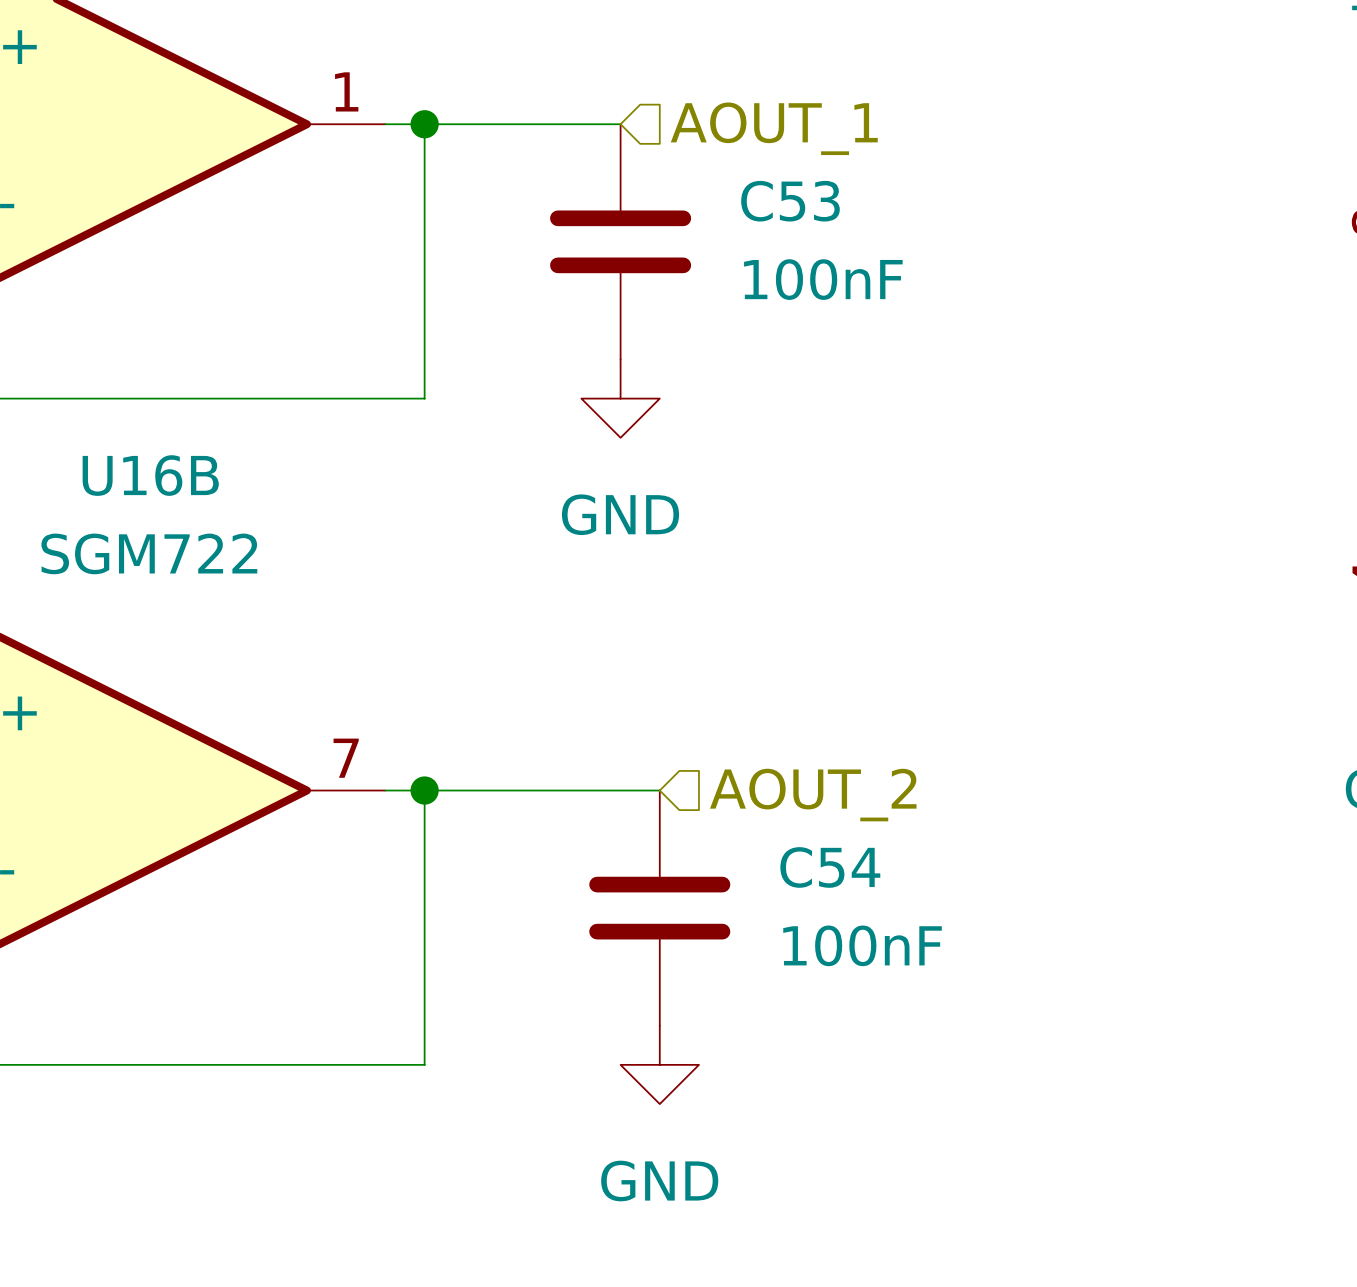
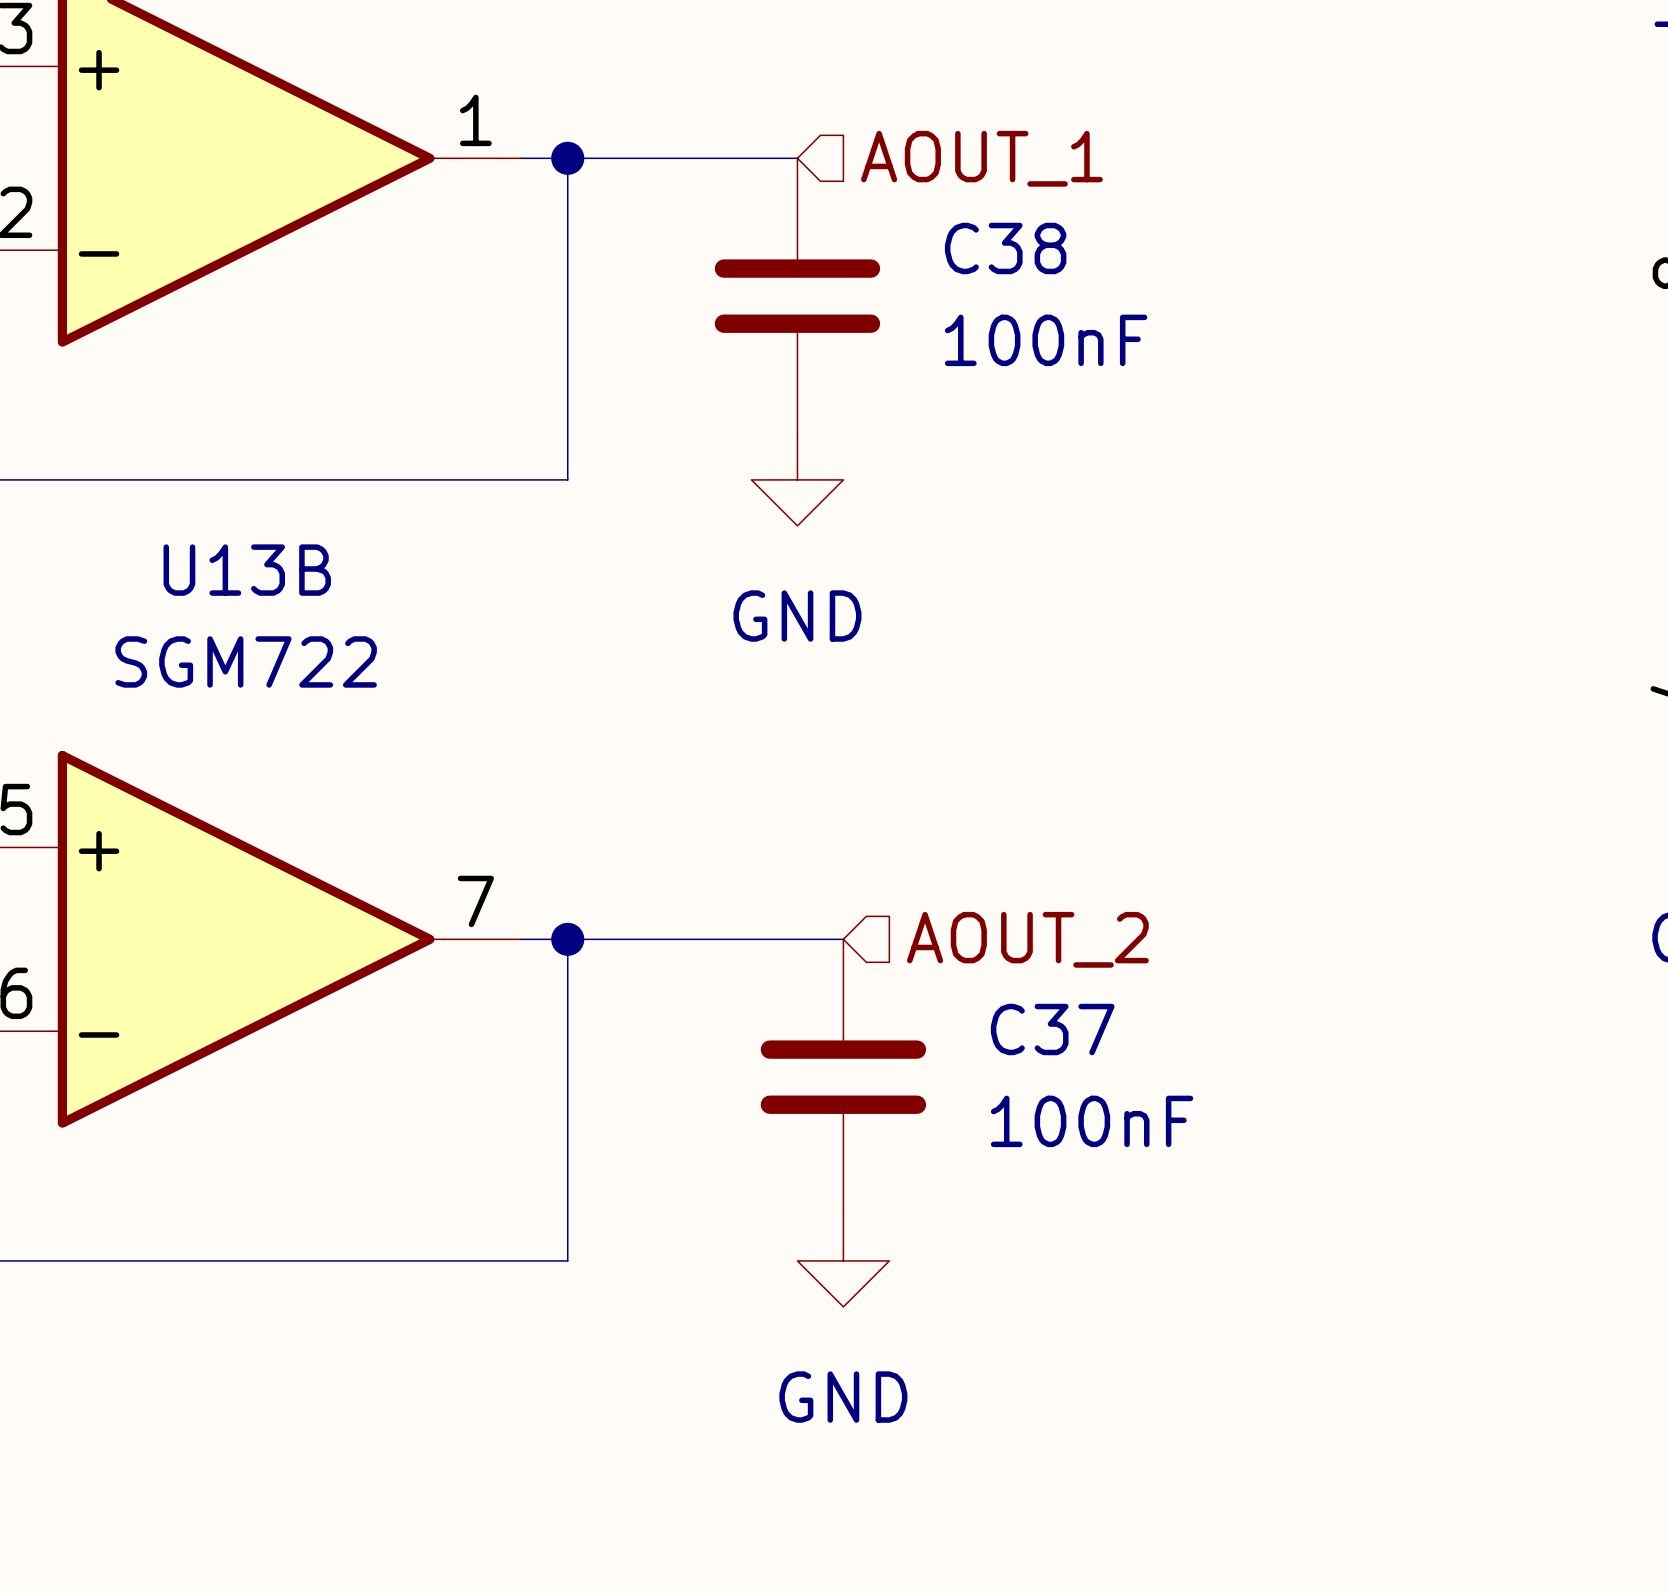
C53 name: C53 (790, 201) -> C38 (1005, 248)
U16B name: U16B (150, 475) -> U13B (247, 570)
C54 name: C54 (830, 867) -> C37 (1052, 1029)

